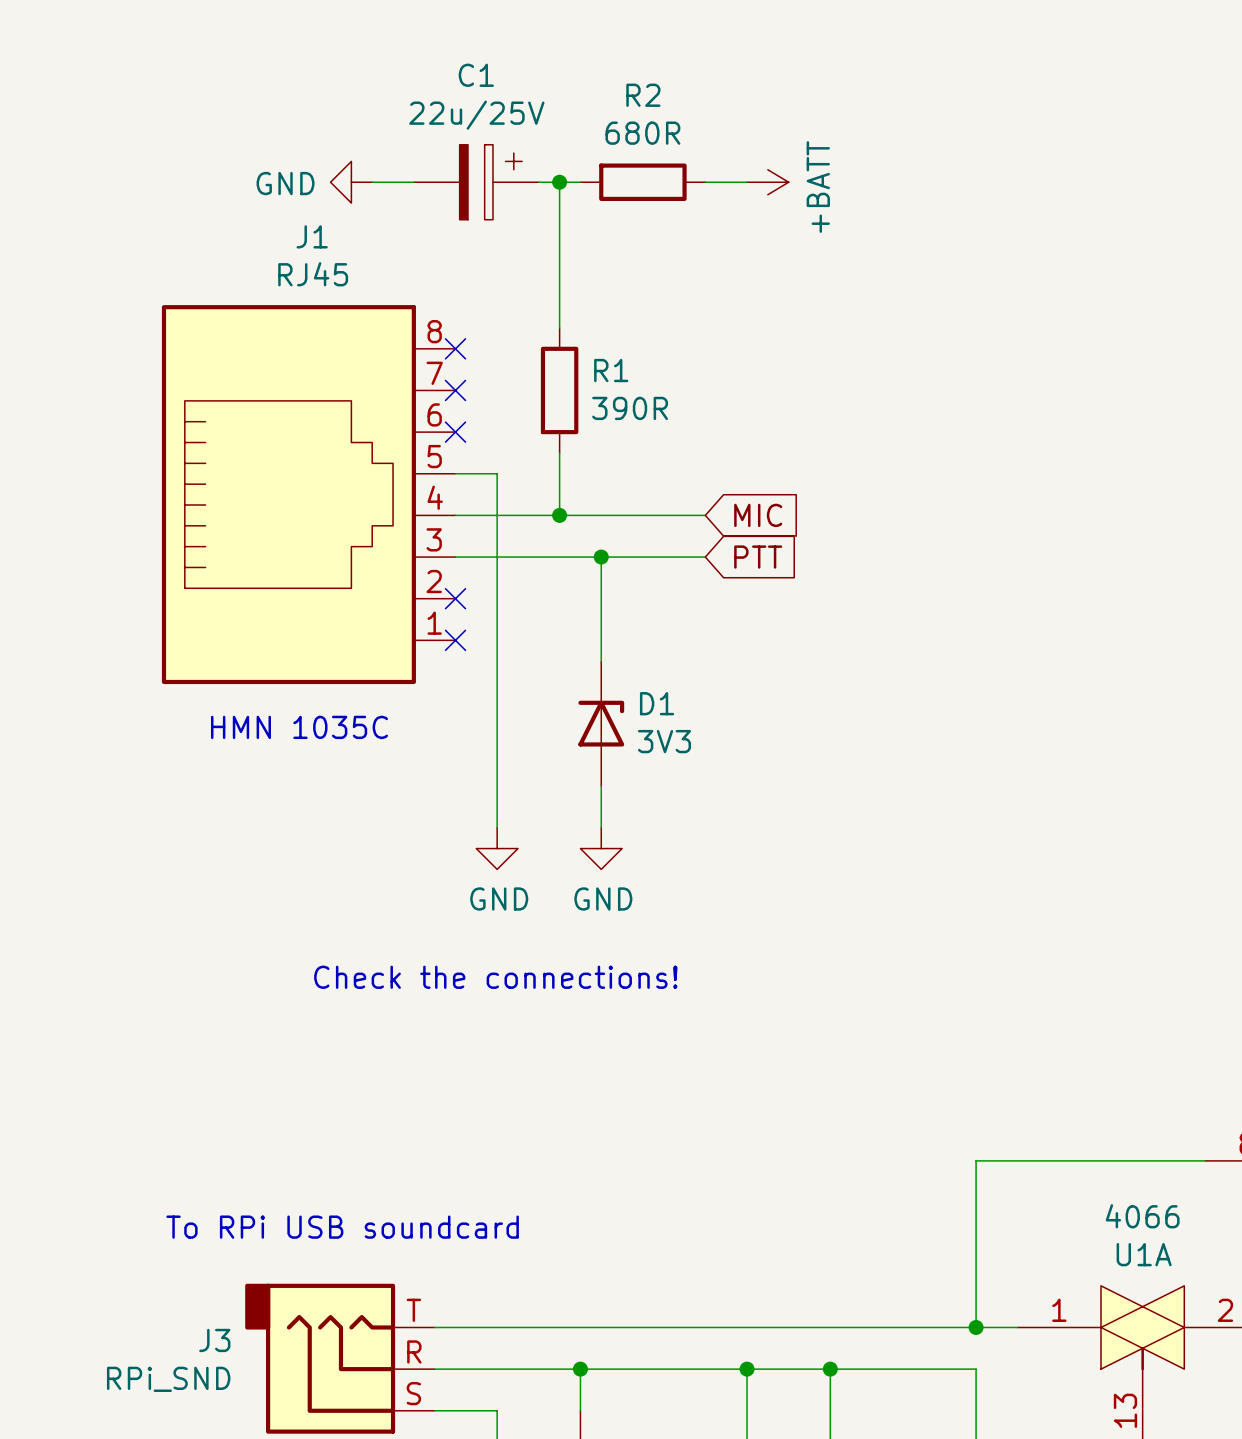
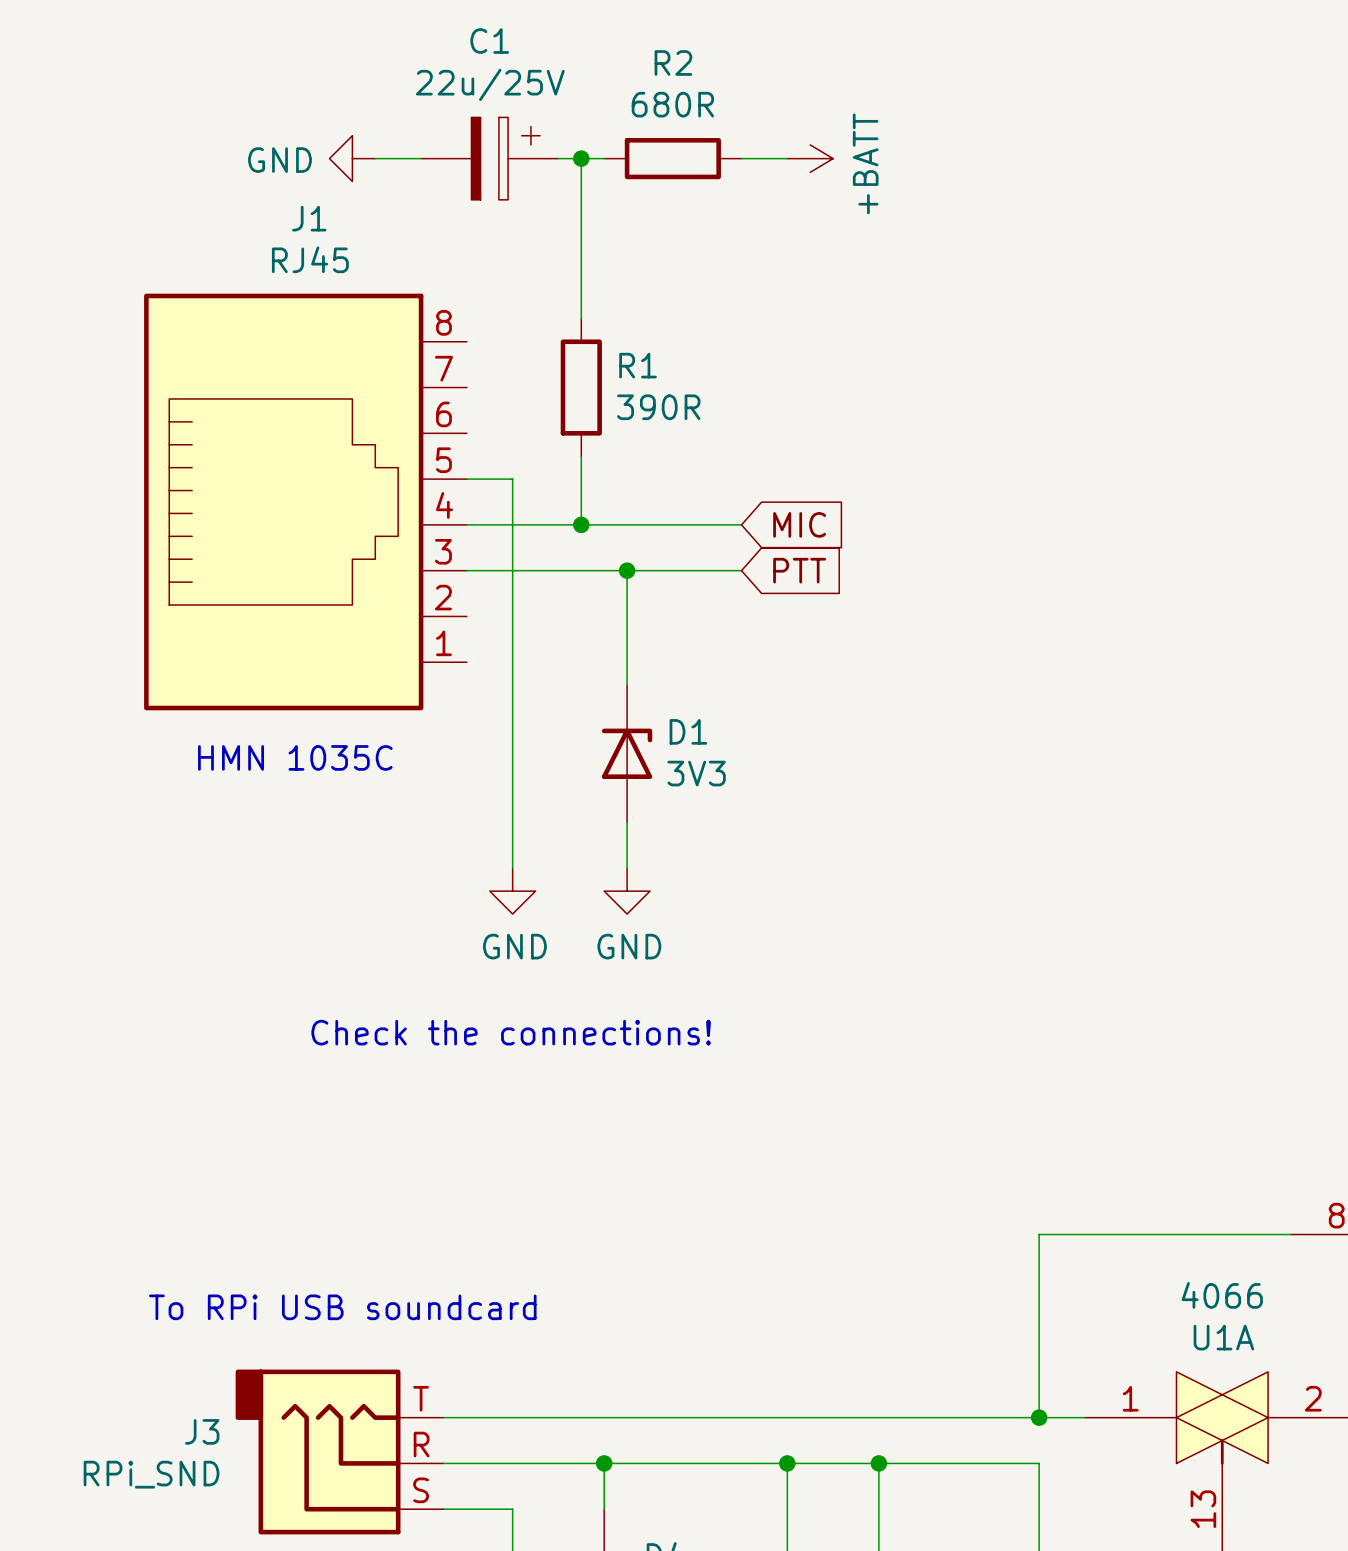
no-connect mark: (455, 348) -> none
no-connect mark: (455, 390) -> none
no-connect mark: (455, 432) -> none
no-connect mark: (455, 598) -> none
no-connect mark: (455, 640) -> none

